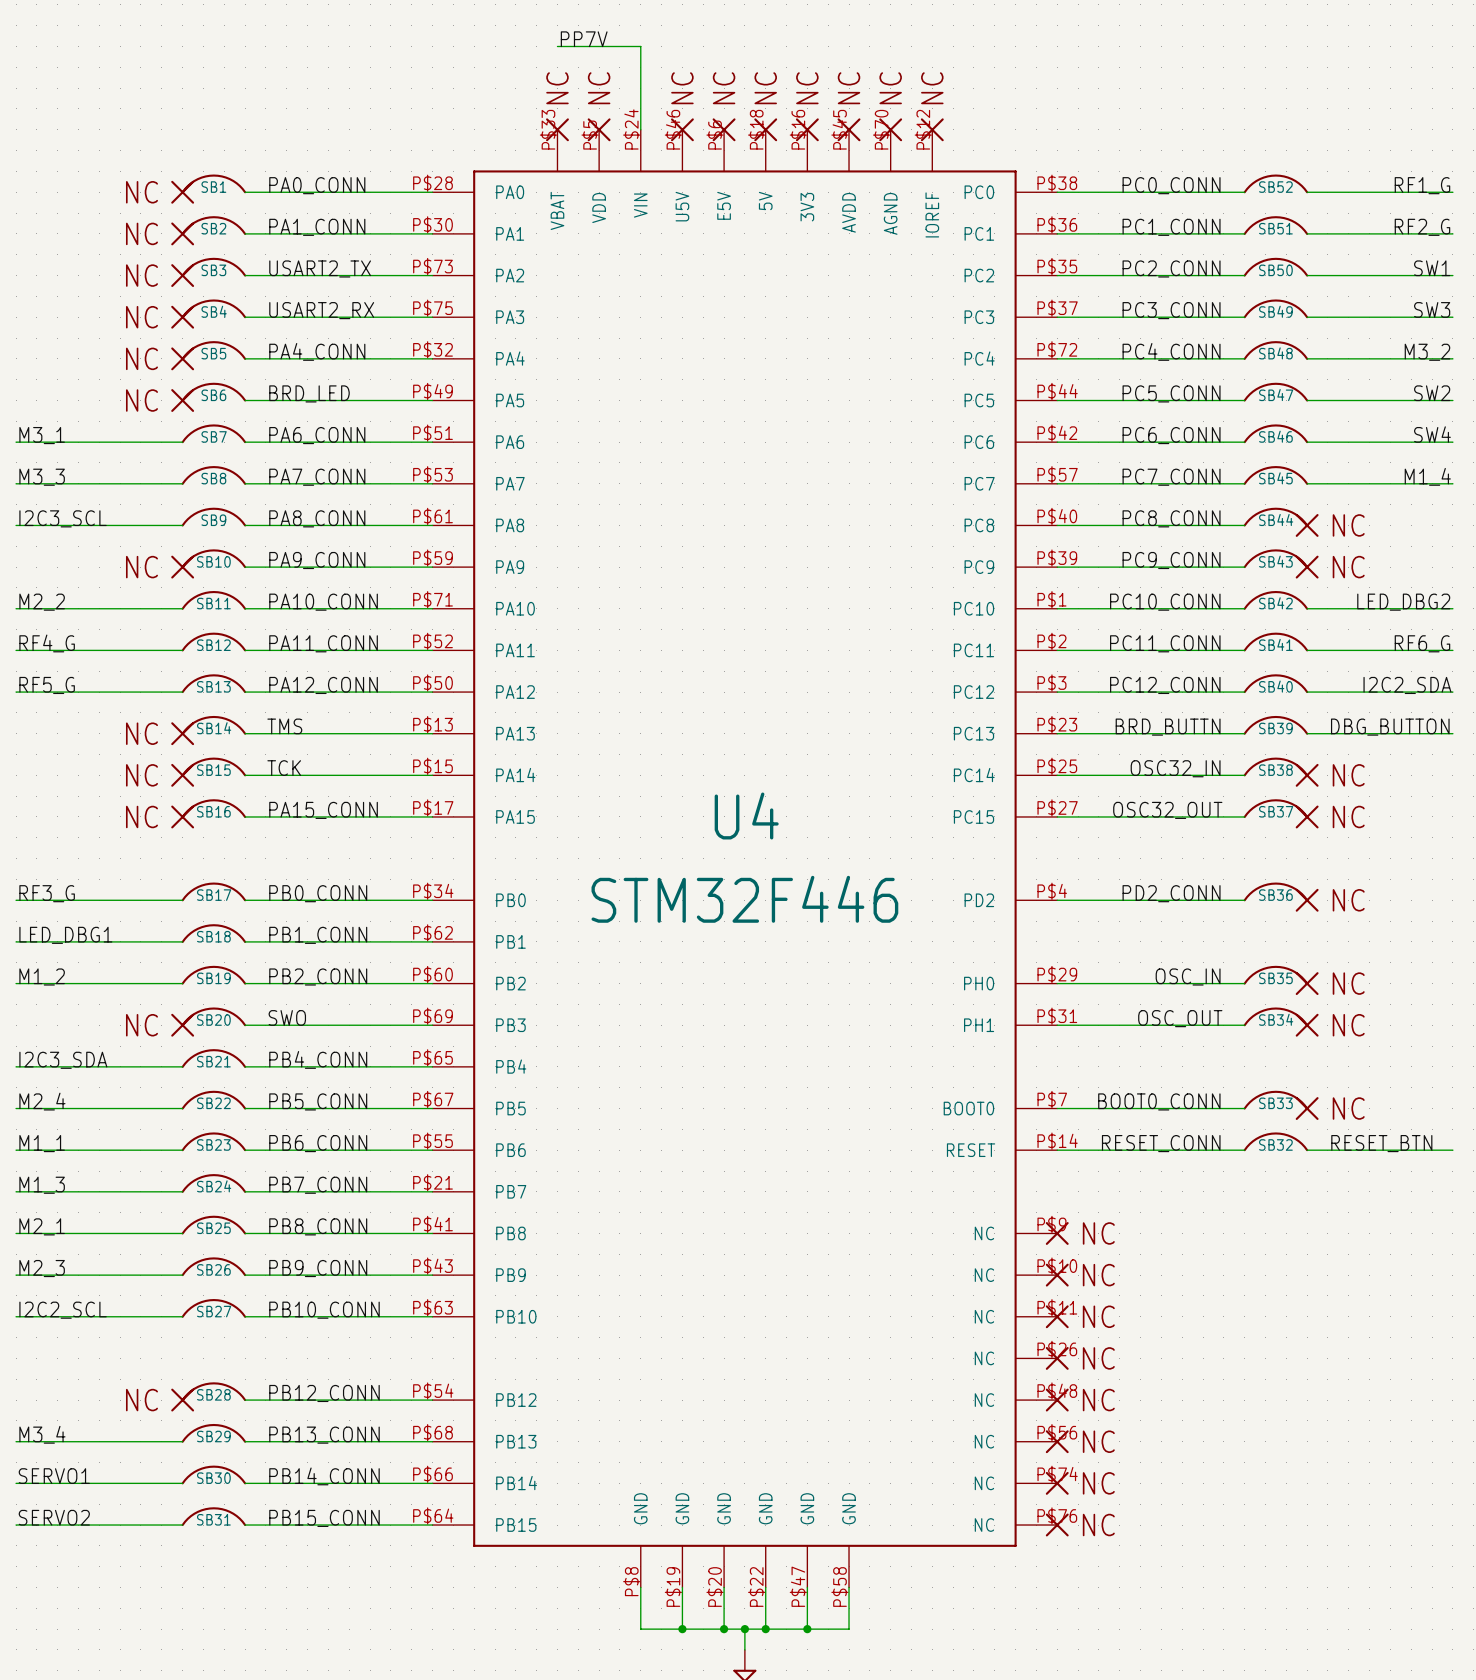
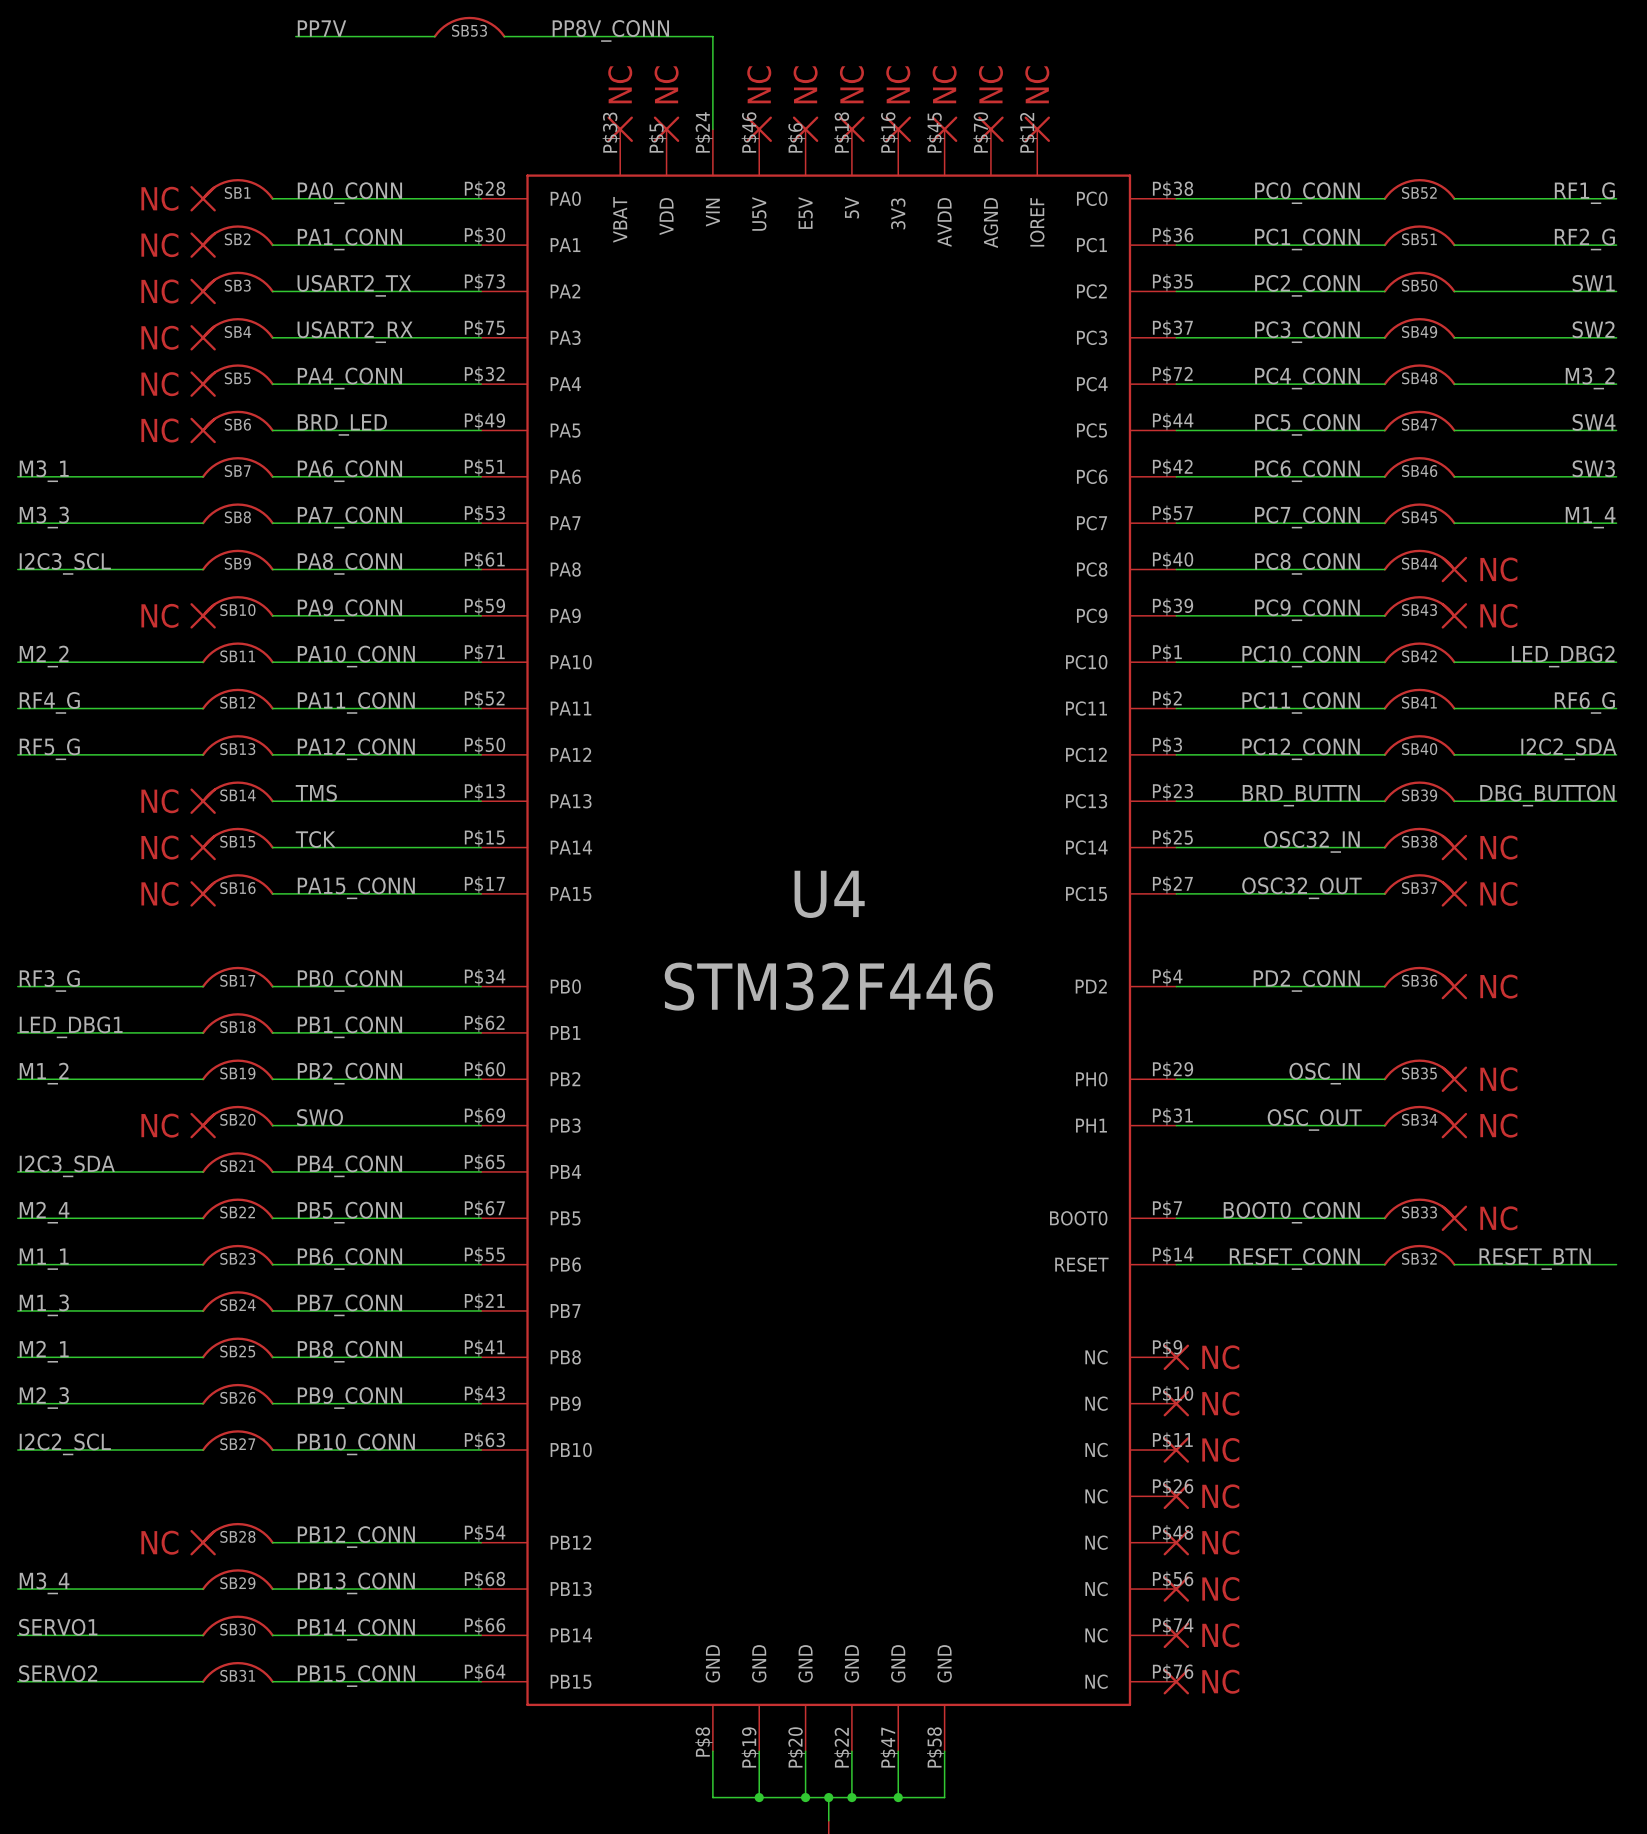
SB53: none -> (469, 27)
label: none -> PP7V (322, 28)
label: none -> PP8V_CONN (610, 30)
label: PP7V (584, 39) -> none
wire: none -> (295, 36) (434, 36)
wire: none -> (504, 36) (620, 36)
label: SW3 (1432, 309) -> SW2 (1593, 329)
label: SW2 (1432, 393) -> SW4 (1594, 422)
label: SW4 (1432, 434) -> SW3 (1593, 468)

